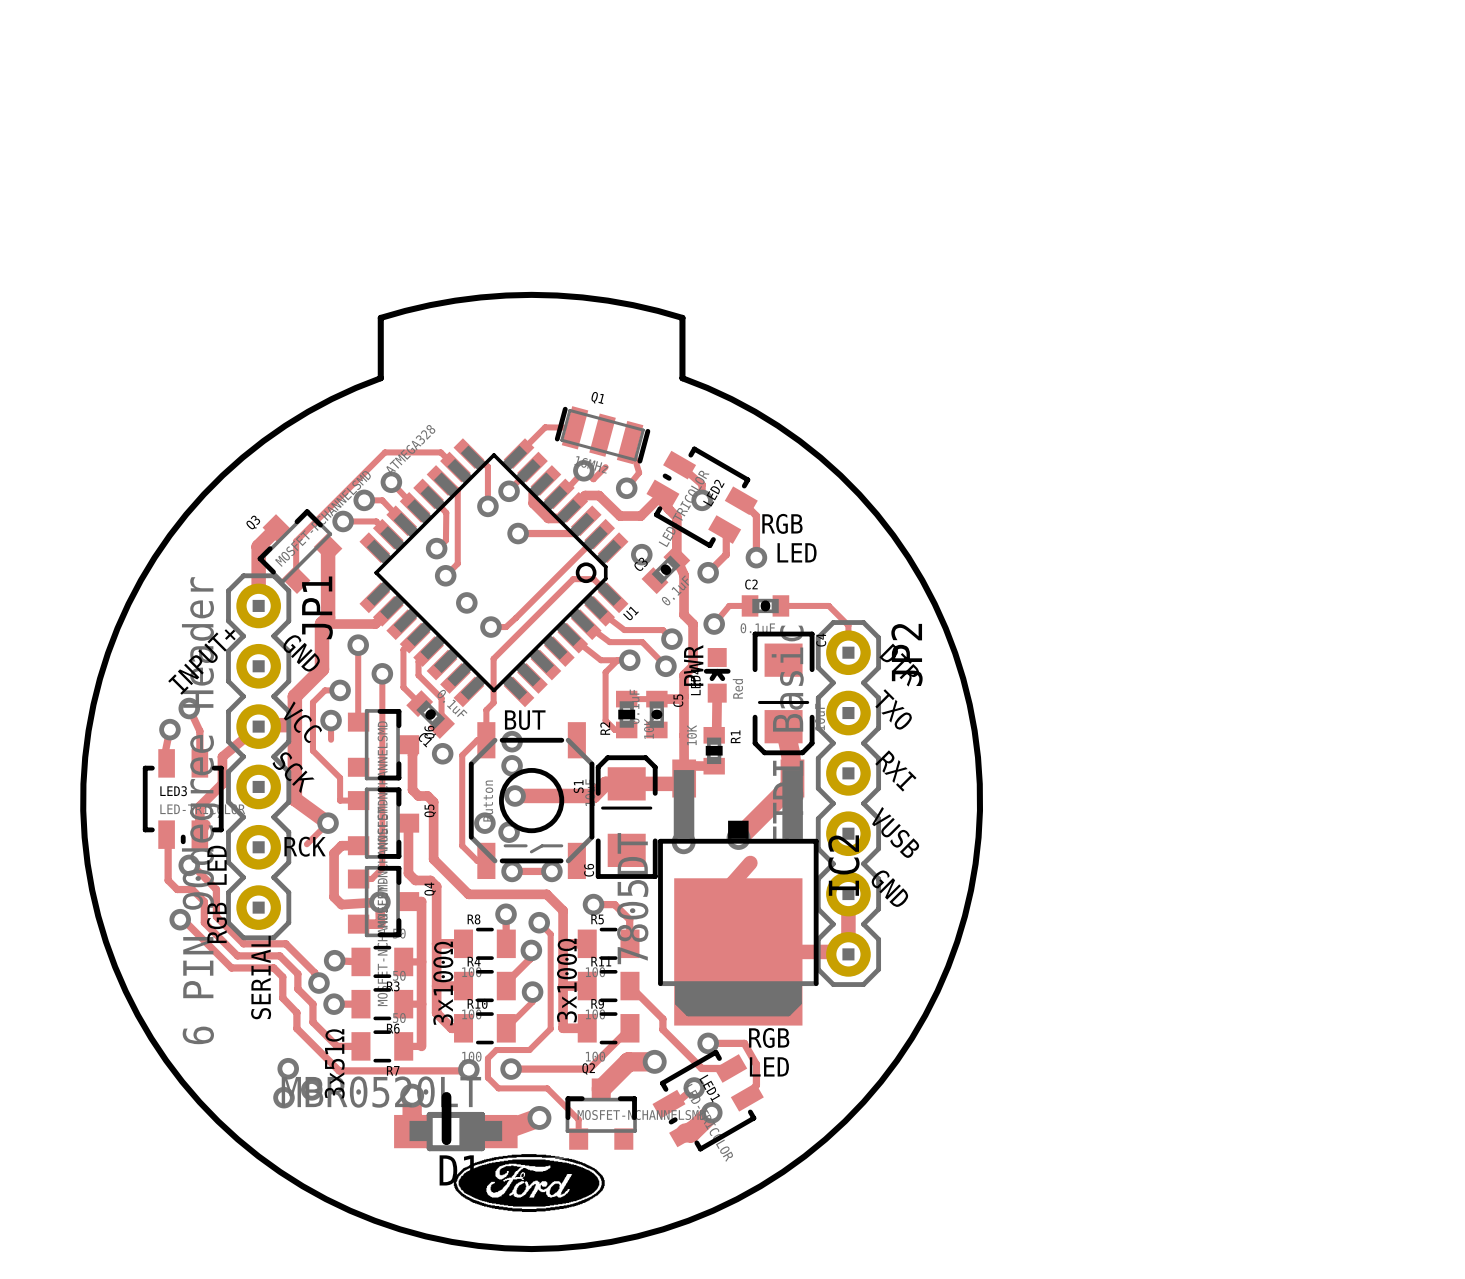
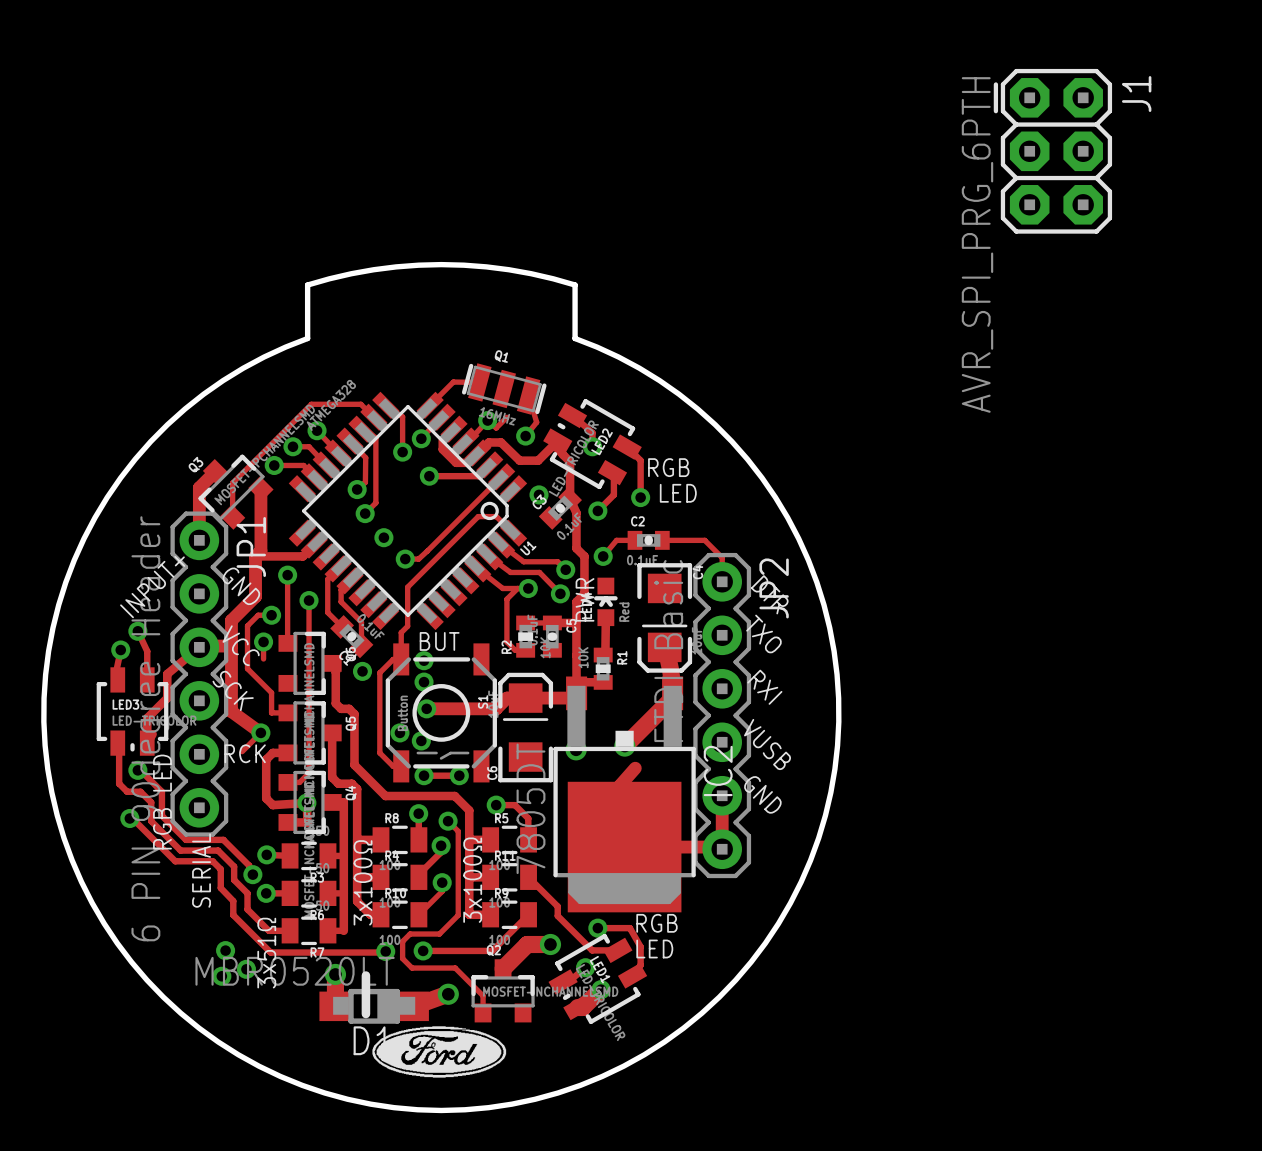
J1: none -> AVR_SPI_PRG_6PTH (1052, 151)

